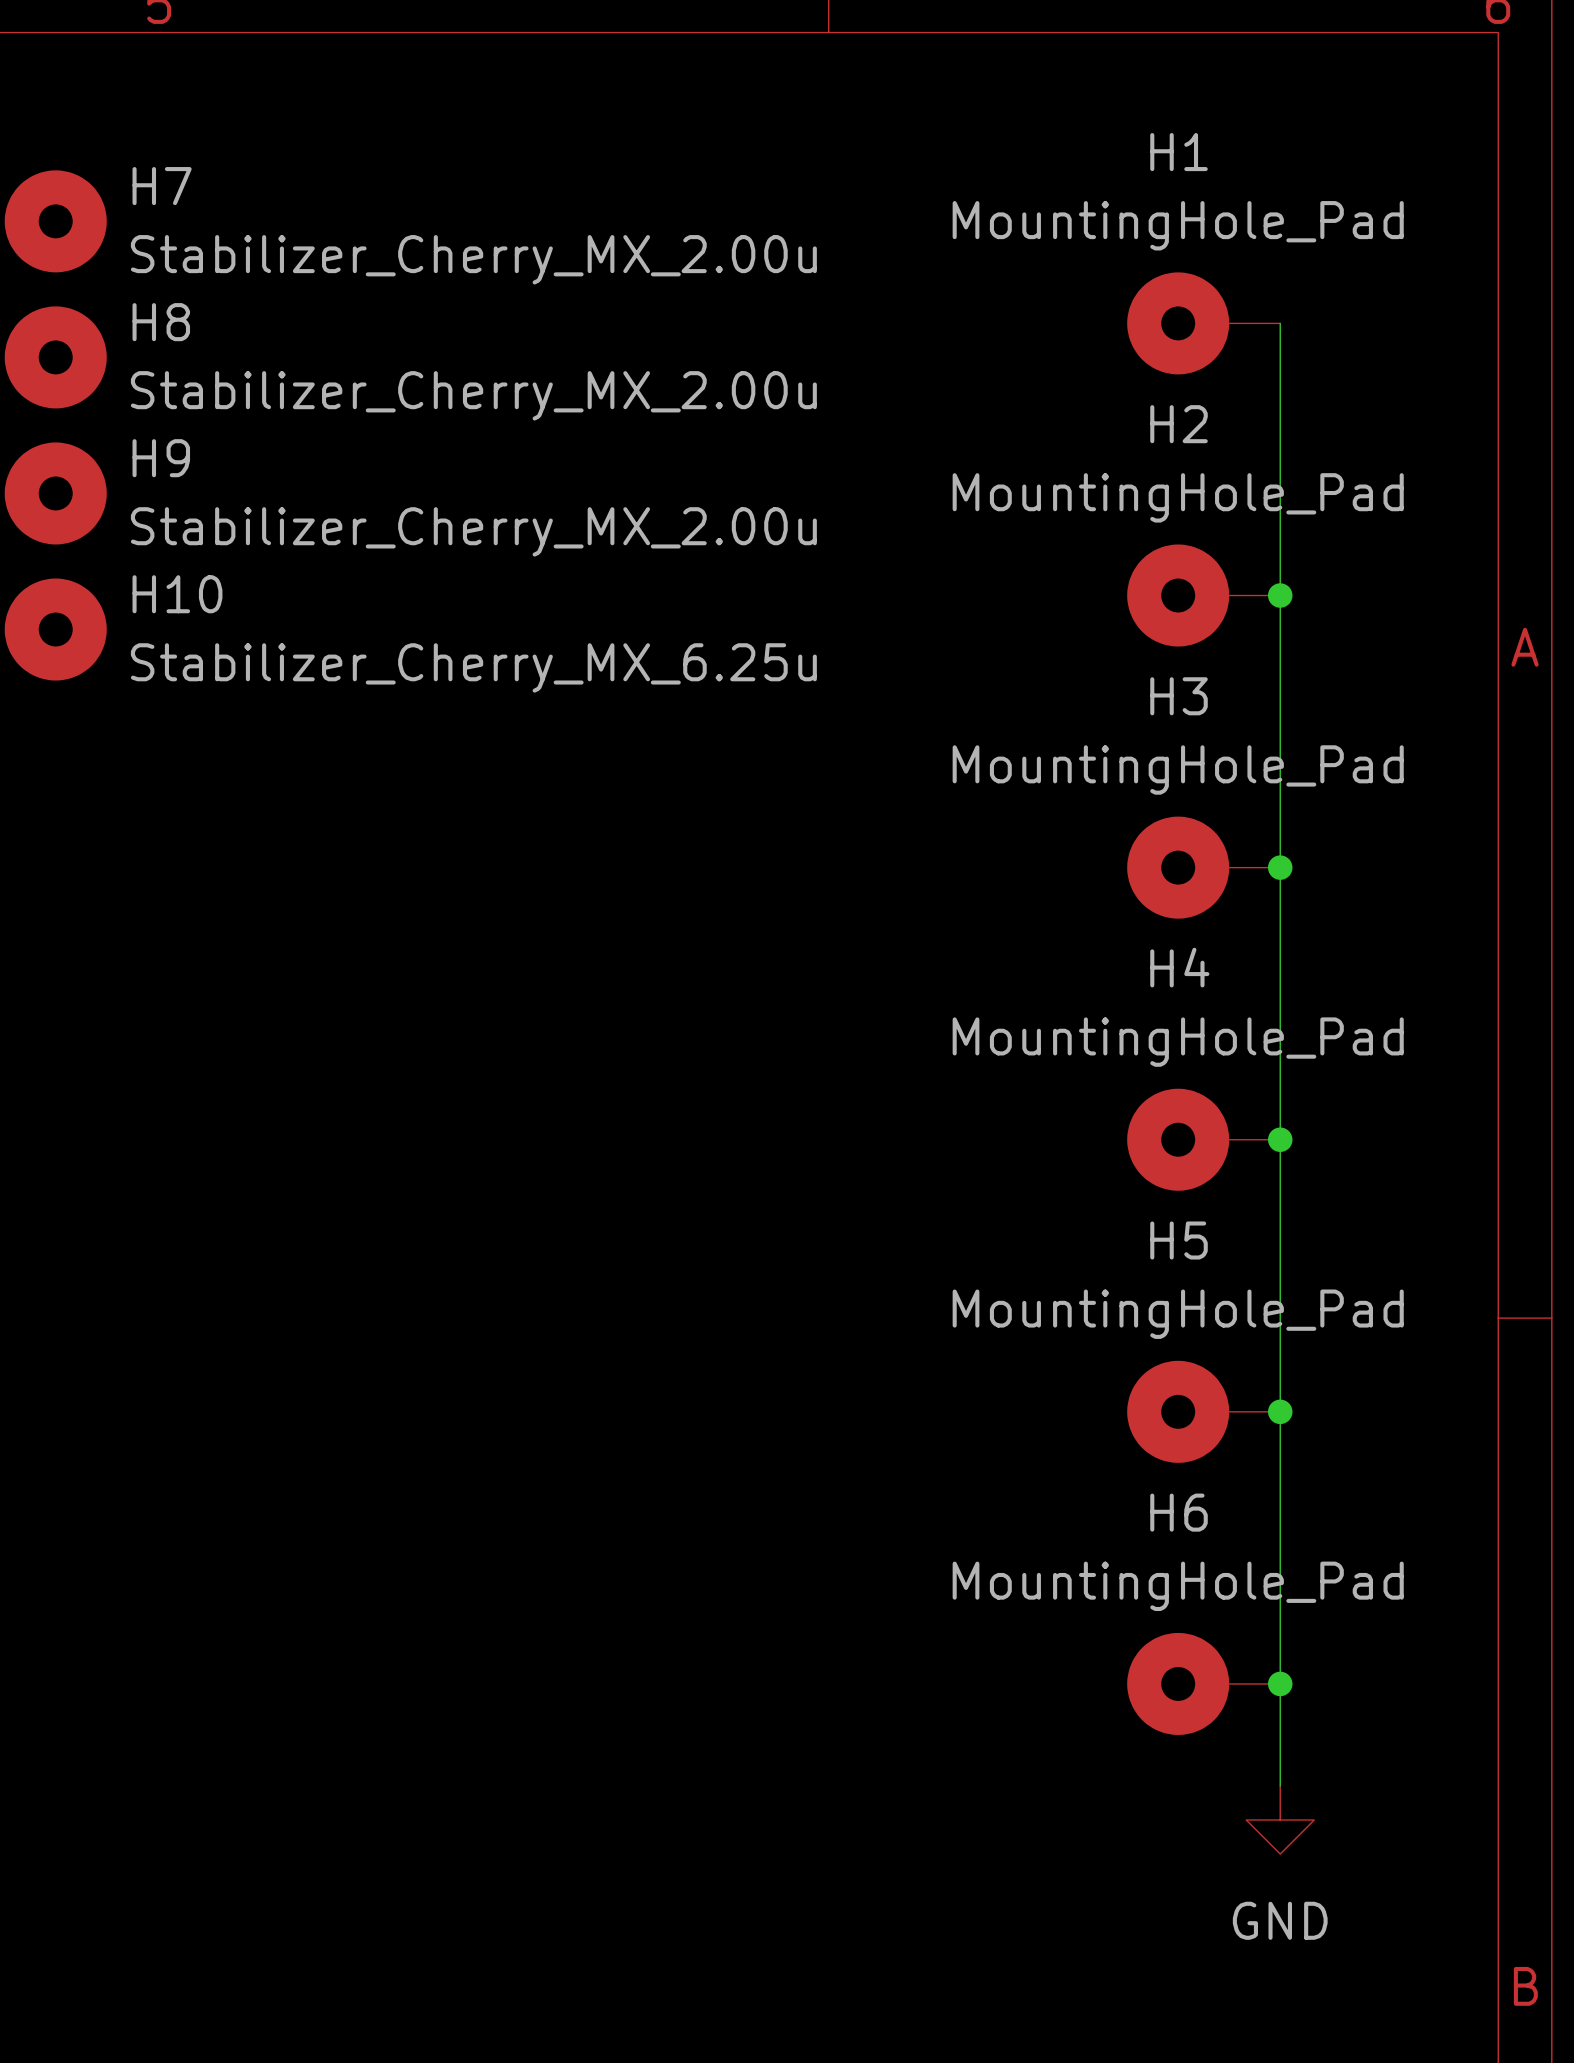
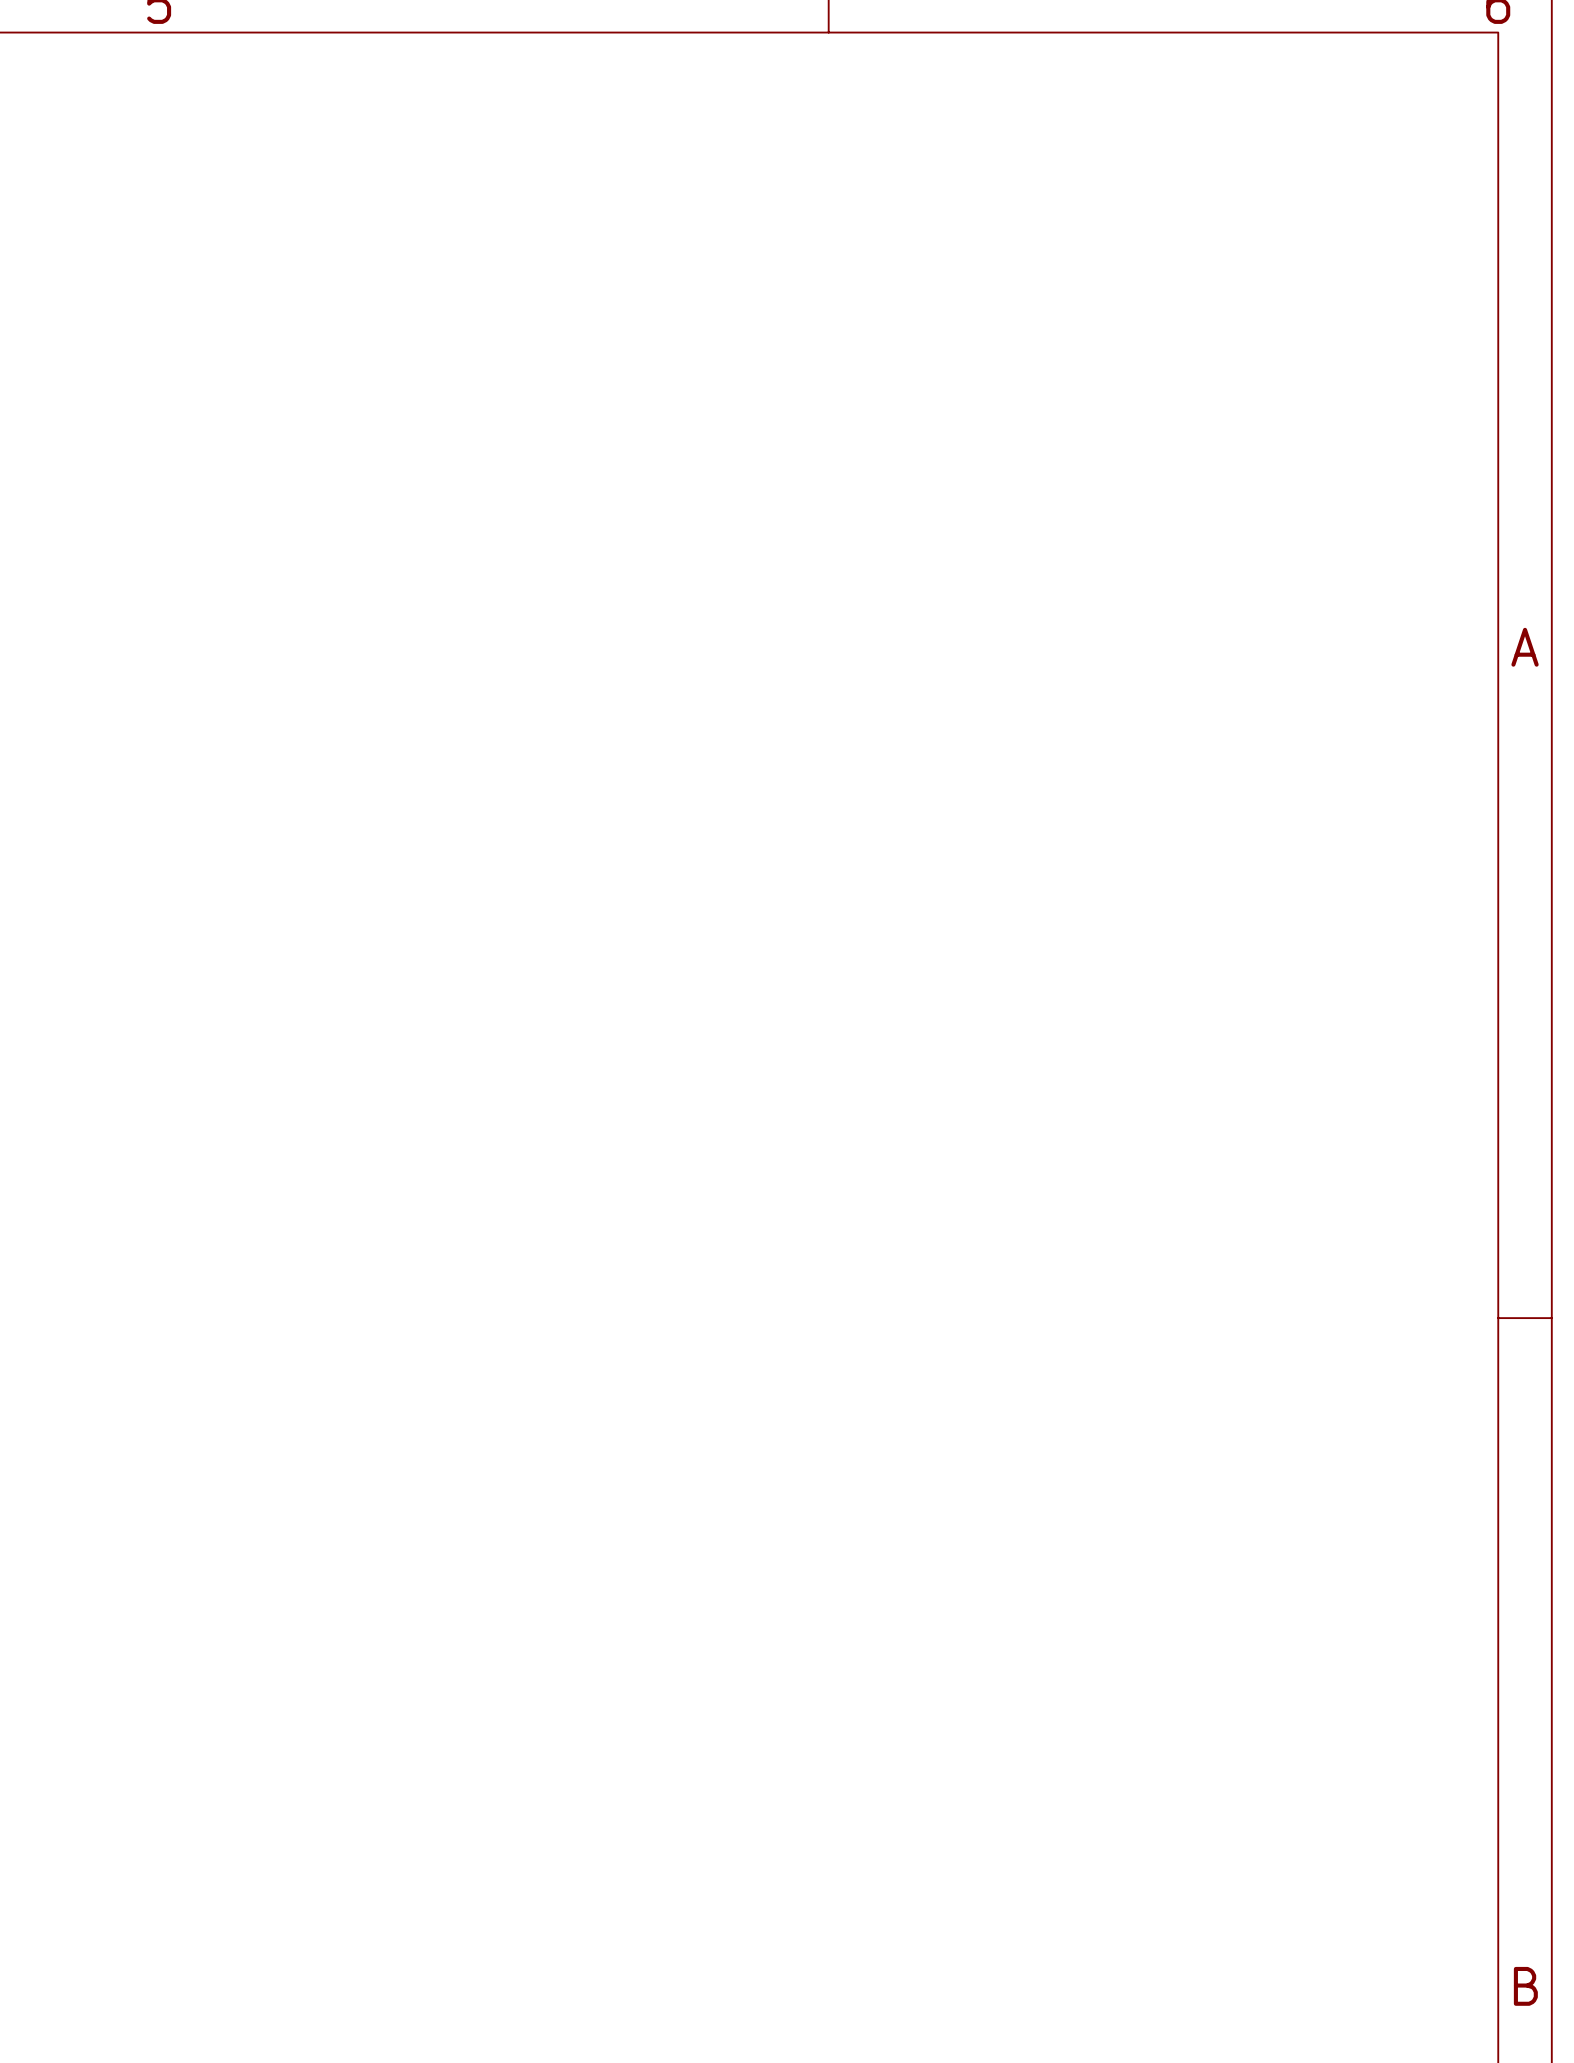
H7: Stabilizer_Cherry_MX_2.00u (55, 221) -> none
H1: MountingHole_Pad (1203, 323) -> none
wire: (1280, 323) (1280, 1785) -> none
H8: Stabilizer_Cherry_MX_2.00u (55, 357) -> none
H9: Stabilizer_Cherry_MX_2.00u (55, 493) -> none
H2: MountingHole_Pad (1203, 595) -> none
junction: (1280, 595) -> none
H10: Stabilizer_Cherry_MX_6.25u (55, 629) -> none
H3: MountingHole_Pad (1203, 867) -> none
junction: (1280, 867) -> none
H4: MountingHole_Pad (1203, 1139) -> none
junction: (1280, 1139) -> none
H5: MountingHole_Pad (1203, 1411) -> none
junction: (1280, 1411) -> none
H6: MountingHole_Pad (1203, 1683) -> none
junction: (1280, 1683) -> none
power symbol: GND (1280, 1820) -> none

